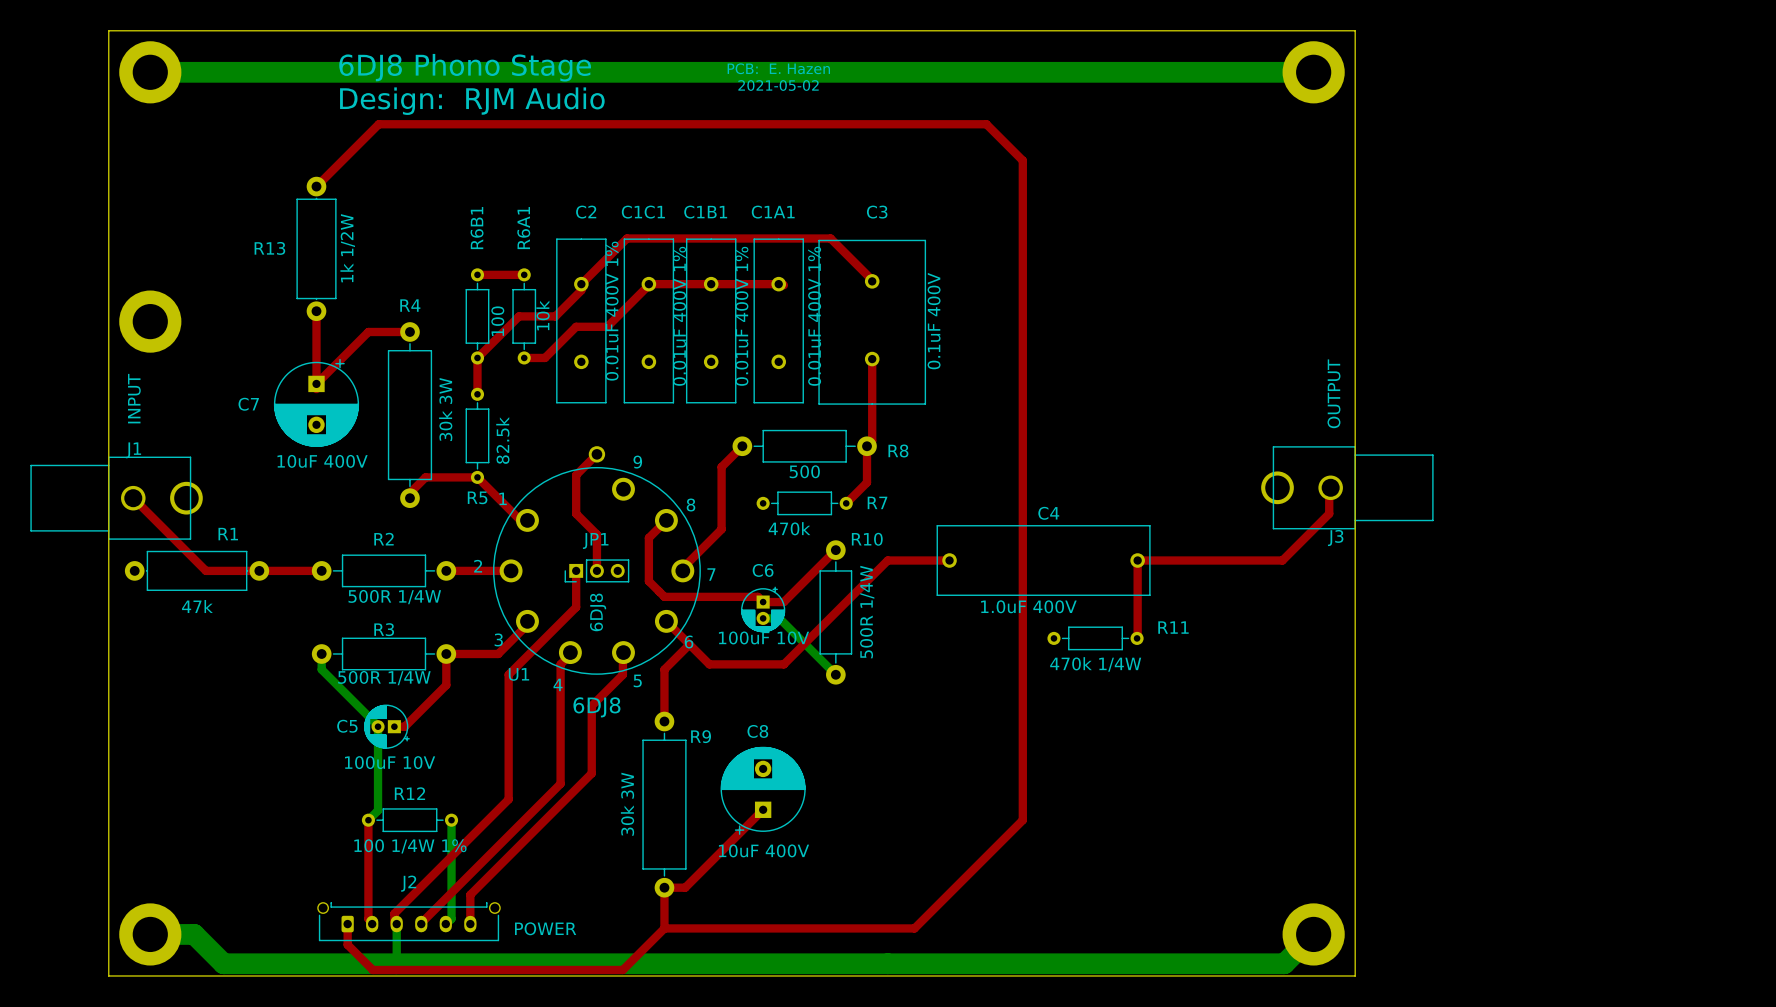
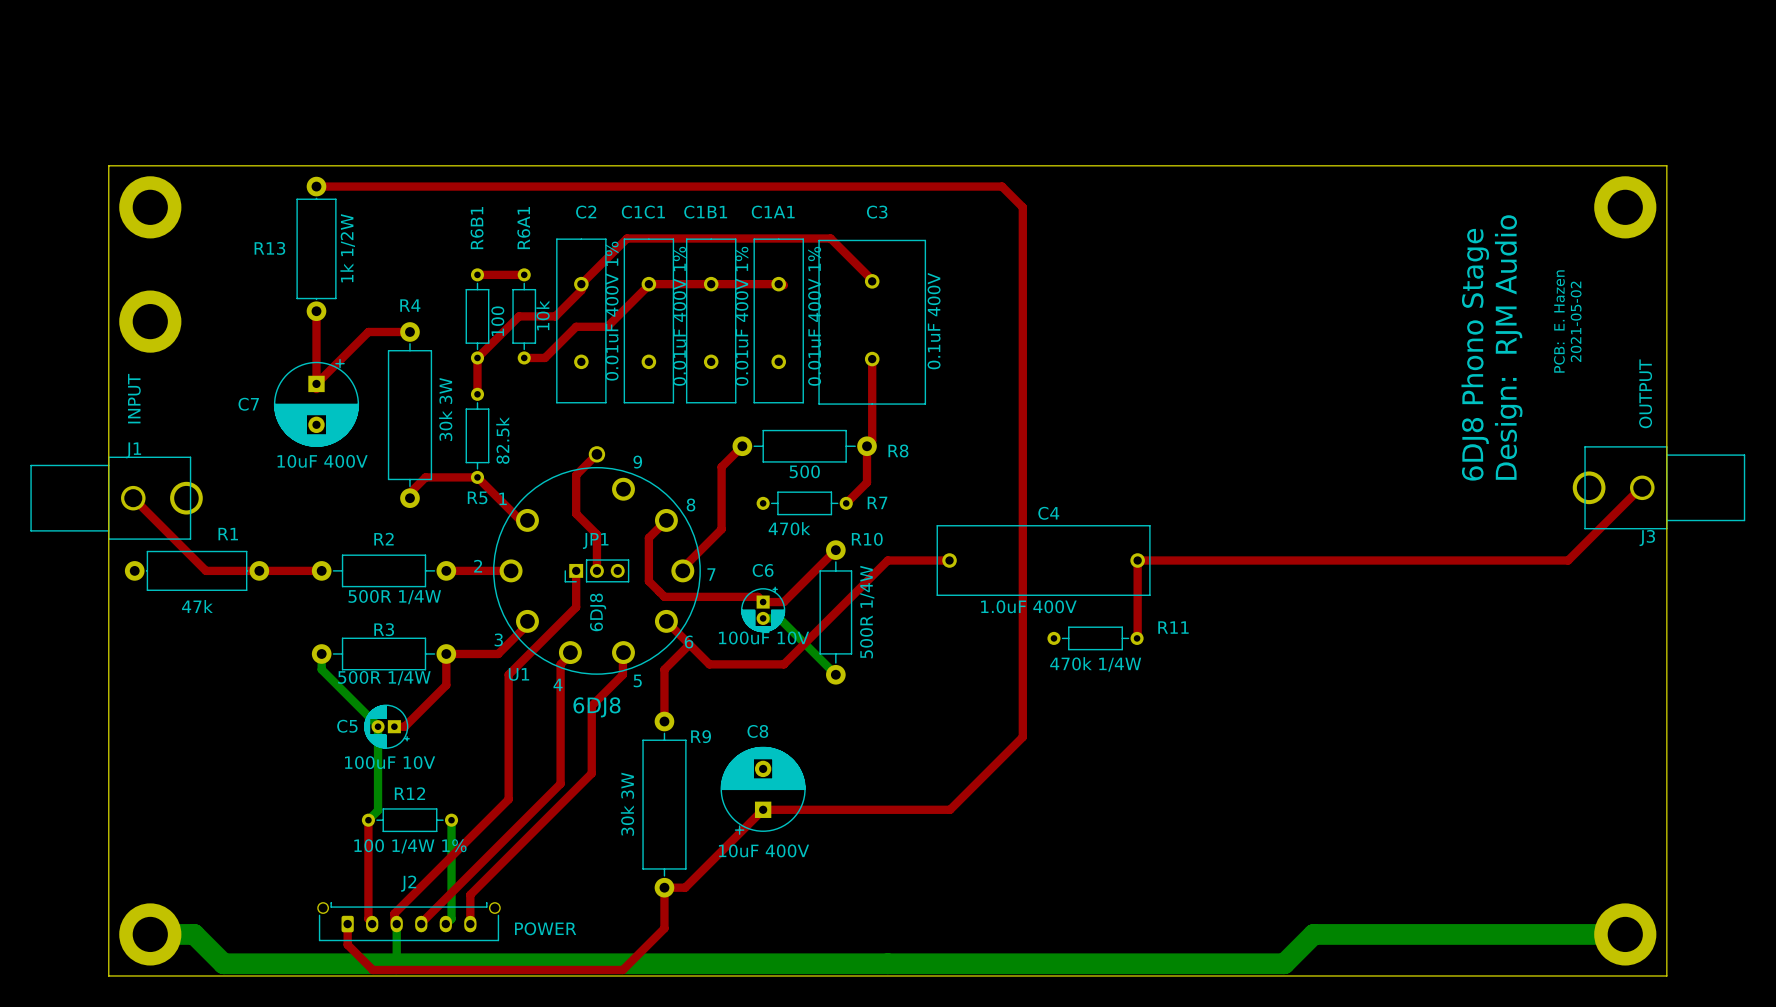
text: 6DJ8 Phono Stage (465, 67) -> none
text: PCB: E. Hazen (778, 68) -> none
bottom track: (150, 72) (1313, 72) -> none
part position: (150, 72) -> (150, 207)
part: (1313, 72) -> none
text: 2021-05-02 (778, 85) -> none
text: Design: RJM Audio (472, 101) -> none
board edge: (108, 165) (108, 30) (1355, 30) (1355, 975) -> (108, 165) (1666, 165) (1666, 975) (1355, 975)
top track: (316, 186) (378, 124) (986, 124) (1022, 160) (1022, 207) -> (316, 186) (1002, 186) (1022, 207)
part: none -> (1625, 207)
text: none -> PCB: E. Hazen (1559, 321)
text: none -> 2021-05-02 (1576, 321)
text: none -> Design: RJM Audio (1508, 347)
text: none -> 6DJ8 Phono Stage (1475, 354)
top track: (1329, 487) (1329, 513) (1282, 560) -> (1640, 487) (1568, 560) (1282, 560)
J3 position: (1347, 487) -> (1658, 487)
top track: (1022, 737) (1022, 820) (914, 928) (664, 928) -> (1022, 737) (950, 809) (763, 809)
bottom track: none -> (1313, 934) (1625, 934)
part: (1313, 934) -> none
part: none -> (1625, 934)

